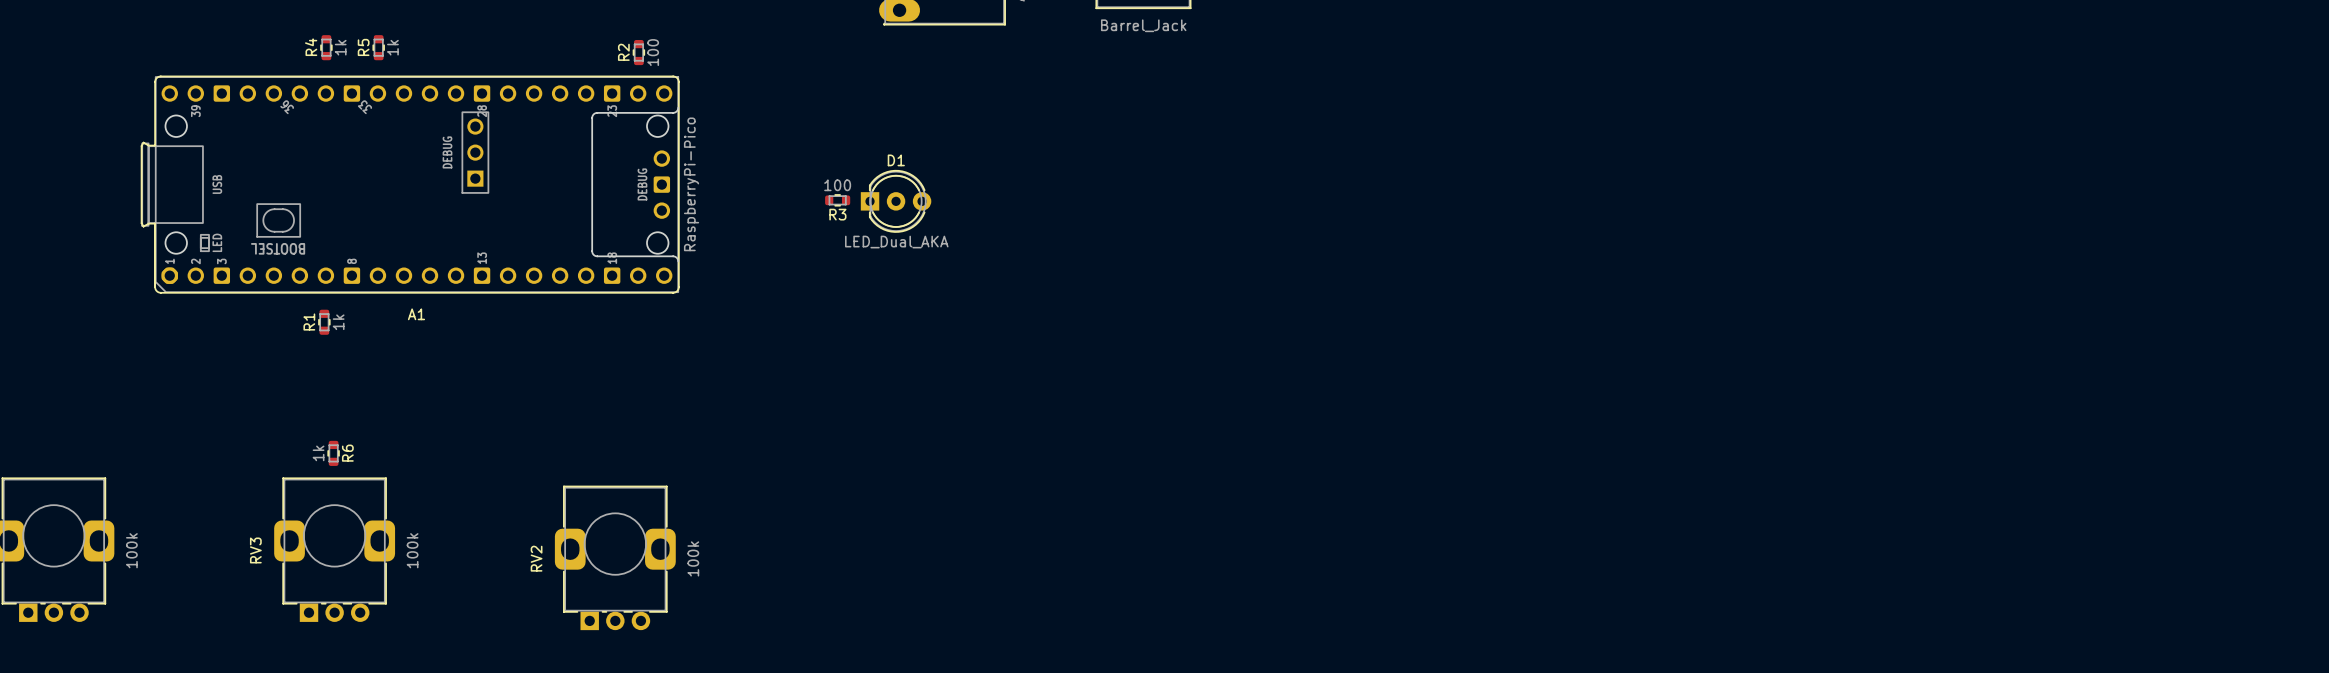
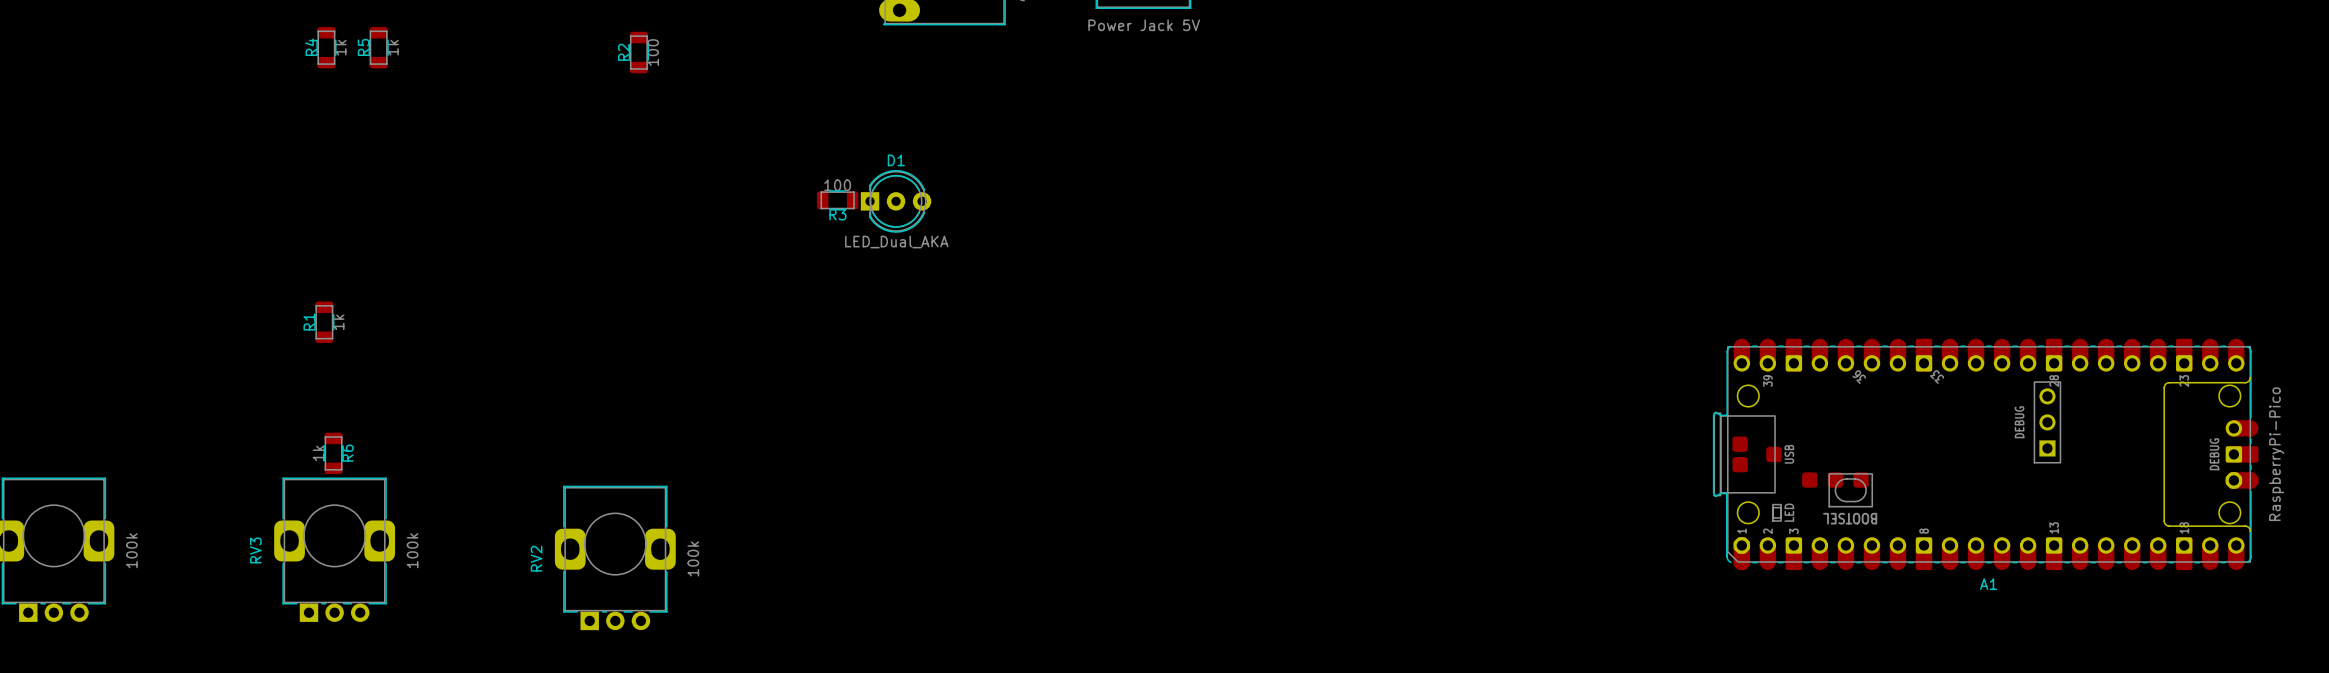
part value: Barrel_Jack (1143, 25) -> Power Jack 5V (1144, 25)
R4 footprint: [320, 35, 333, 61] -> [316, 26, 337, 69]
R5 footprint: [372, 35, 385, 61] -> [368, 26, 389, 69]
R2 footprint: [632, 40, 645, 66] -> [628, 31, 649, 74]
A1 footprint: [140, 75, 680, 294] -> [1713, 338, 2259, 571]
R3 footprint: [825, 194, 851, 207] -> [816, 190, 859, 211]
R1 footprint: [318, 309, 331, 335] -> [314, 301, 335, 344]
R6 footprint: [327, 440, 340, 466] -> [323, 432, 344, 475]

